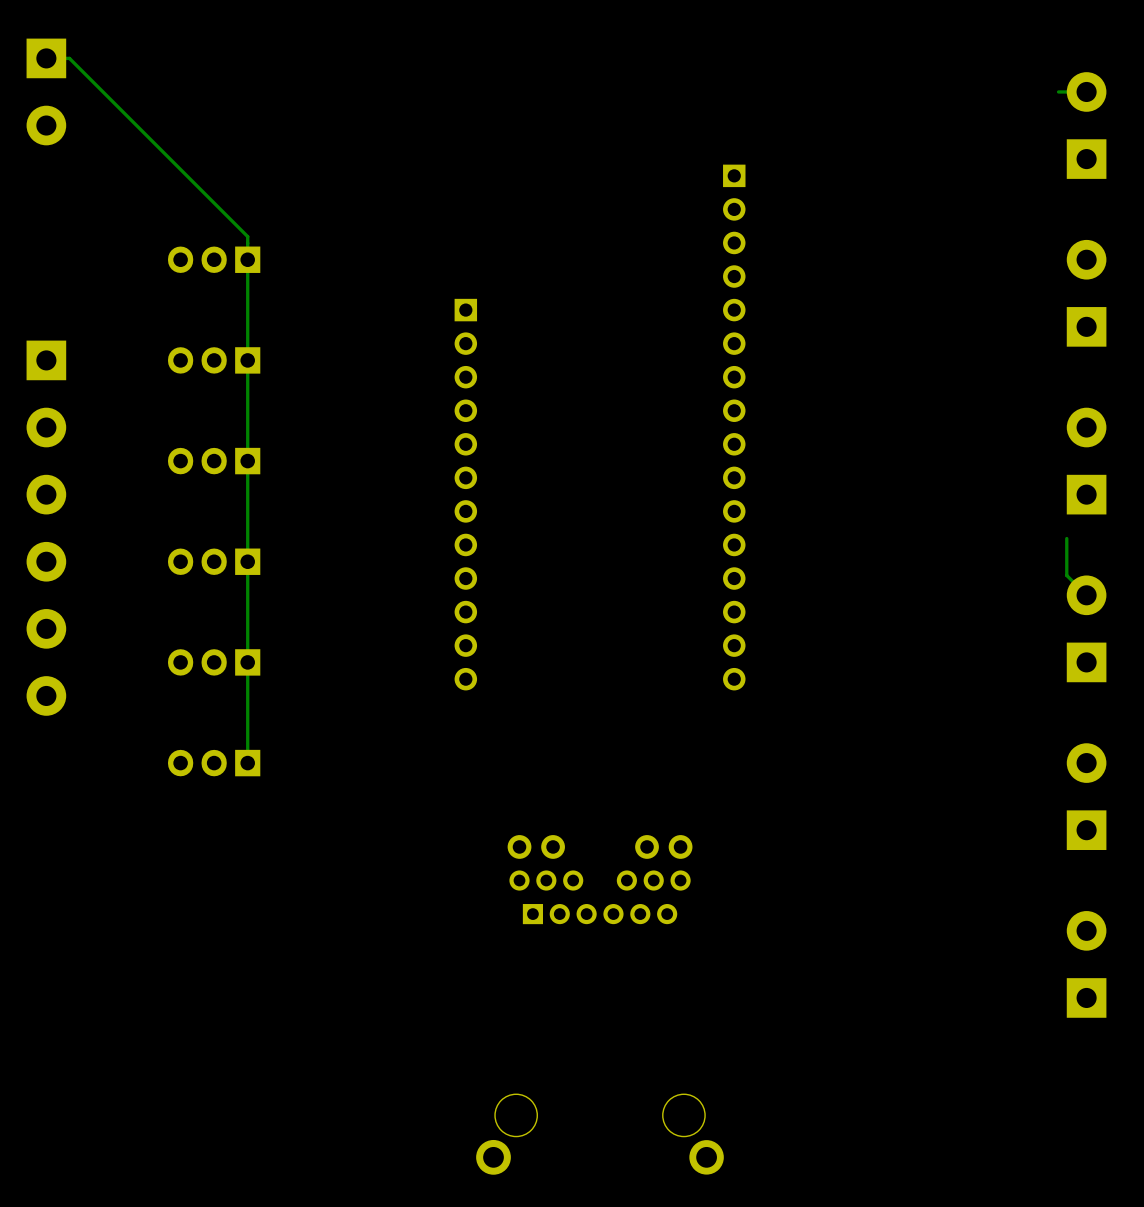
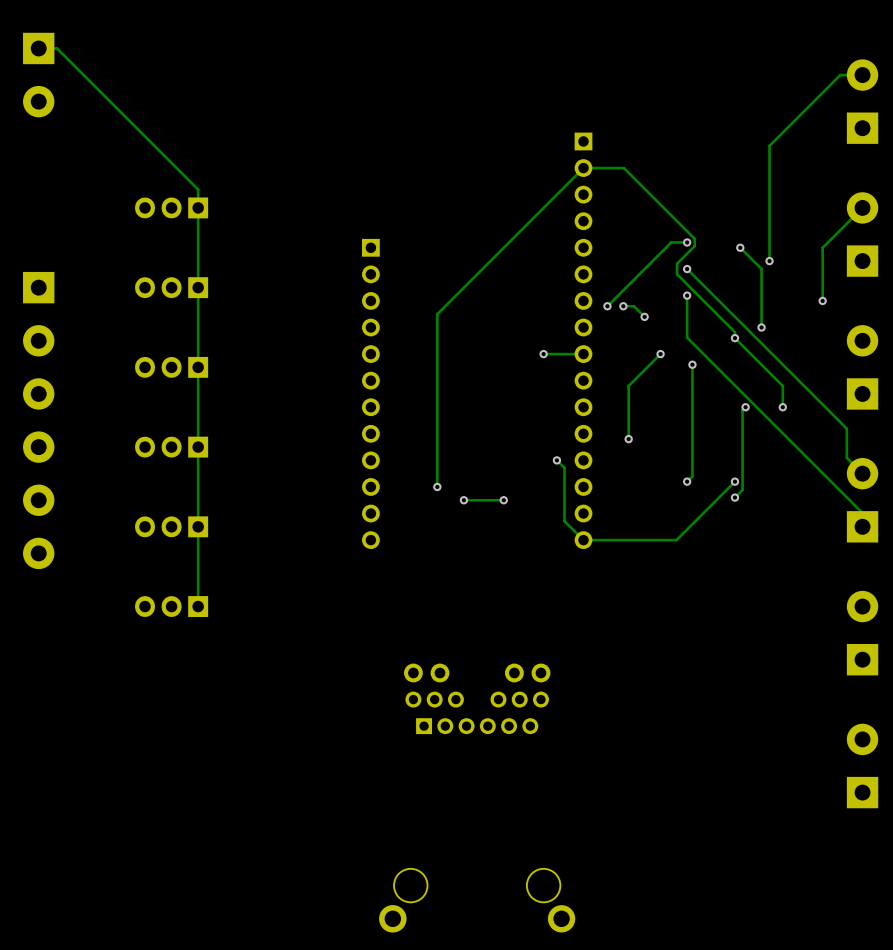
track: none -> (840, 75) (769, 145) (769, 261)
track: none -> (862, 207) (822, 247) (822, 300)
track: none -> (687, 242) (671, 242) (607, 306)
via: none -> (687, 242)
track: none -> (740, 247) (761, 269) (761, 327)
via: none -> (740, 247)
via: none -> (769, 261)
track: none -> (687, 269) (846, 428)
via: none -> (687, 269)
track: none -> (687, 295) (687, 337) (862, 512)
via: none -> (687, 295)
via: none -> (822, 300)
via: none -> (607, 306)
track: none -> (623, 306) (633, 306) (644, 316)
via: none -> (623, 306)
via: none -> (644, 316)
via: none -> (761, 327)
via: none -> (734, 338)
via: none -> (543, 354)
track: none -> (583, 354) (543, 354)
track: none -> (660, 354) (628, 385) (628, 439)
via: none -> (660, 354)
track: none -> (692, 364) (692, 476) (687, 481)
via: none -> (692, 364)
track: none -> (745, 407) (742, 410) (742, 490) (734, 497)
via: none -> (745, 407)
track: none -> (782, 407) (782, 385) (734, 338) (734, 332) (677, 274) (677, 263) (694, 246) (694, 238) (623, 168) (583, 168) (437, 314) (437, 486)
via: none -> (782, 407)
via: none -> (628, 439)
track: none -> (556, 460) (564, 467) (564, 521) (583, 540) (676, 540) (734, 481)
via: none -> (556, 460)
via: none -> (687, 481)
via: none -> (734, 481)
via: none -> (437, 486)
via: none -> (734, 497)
via: none -> (463, 500)
track: none -> (503, 500) (463, 500)
via: none -> (503, 500)

